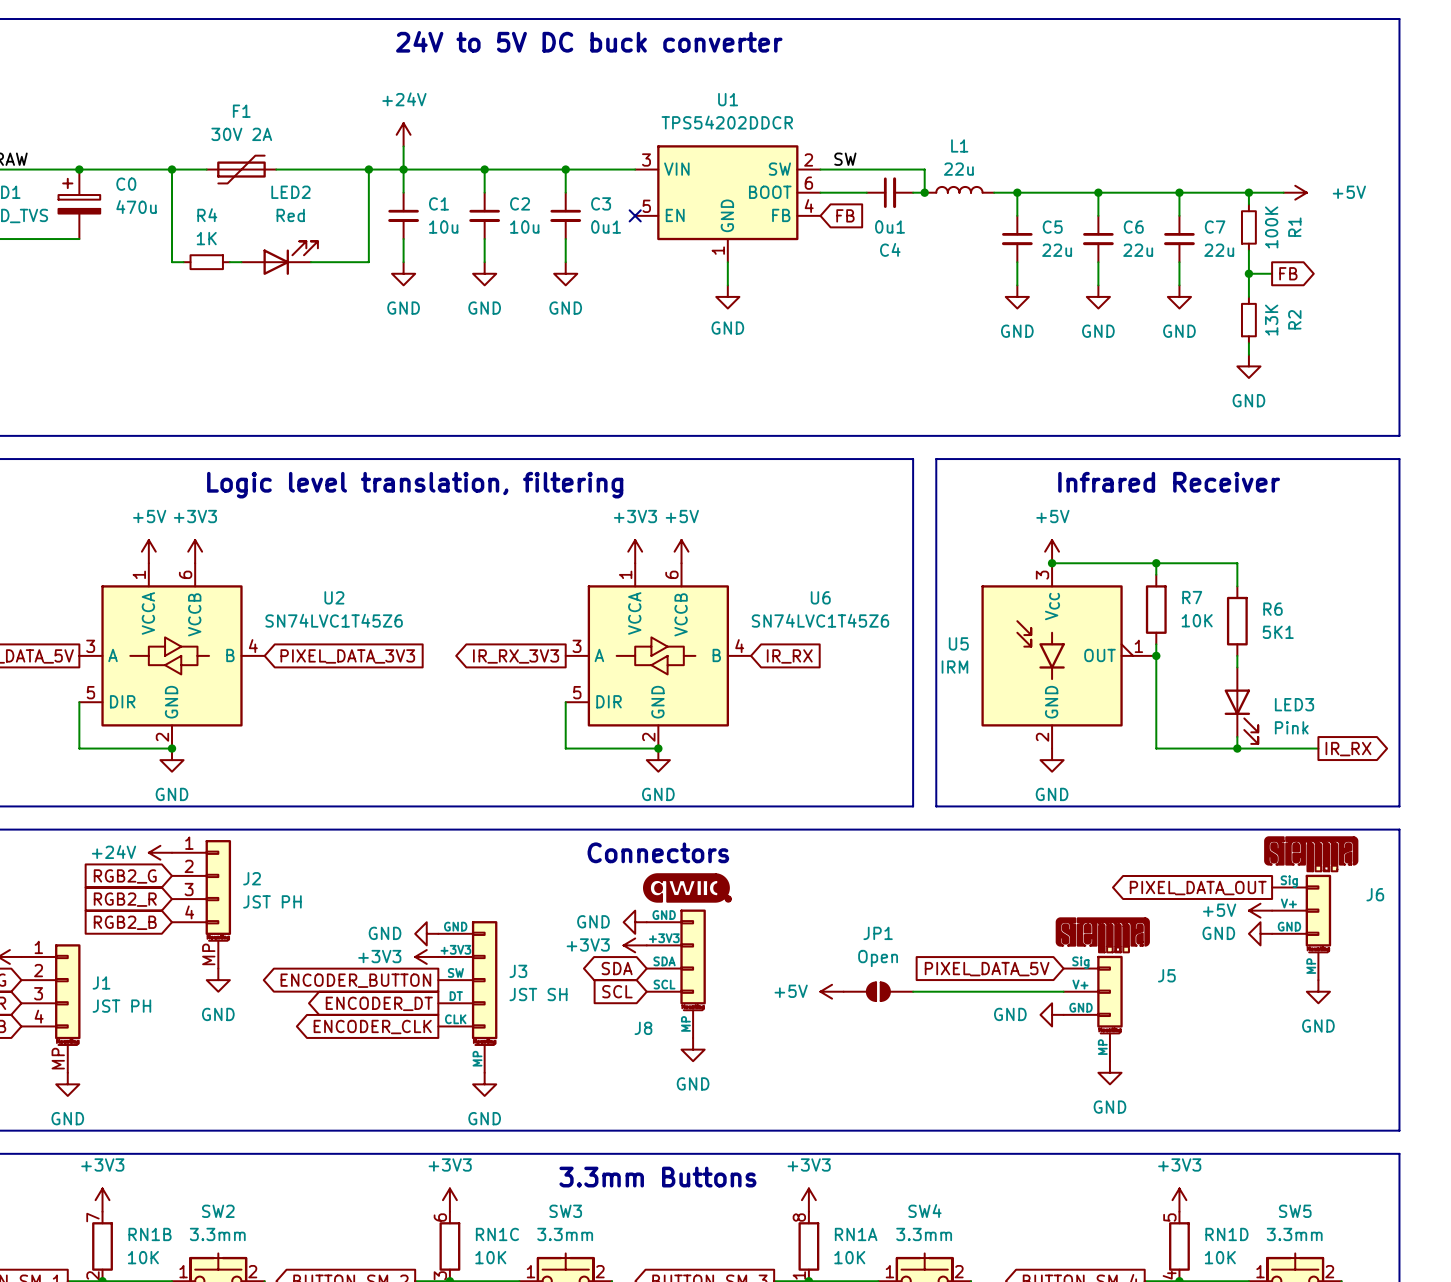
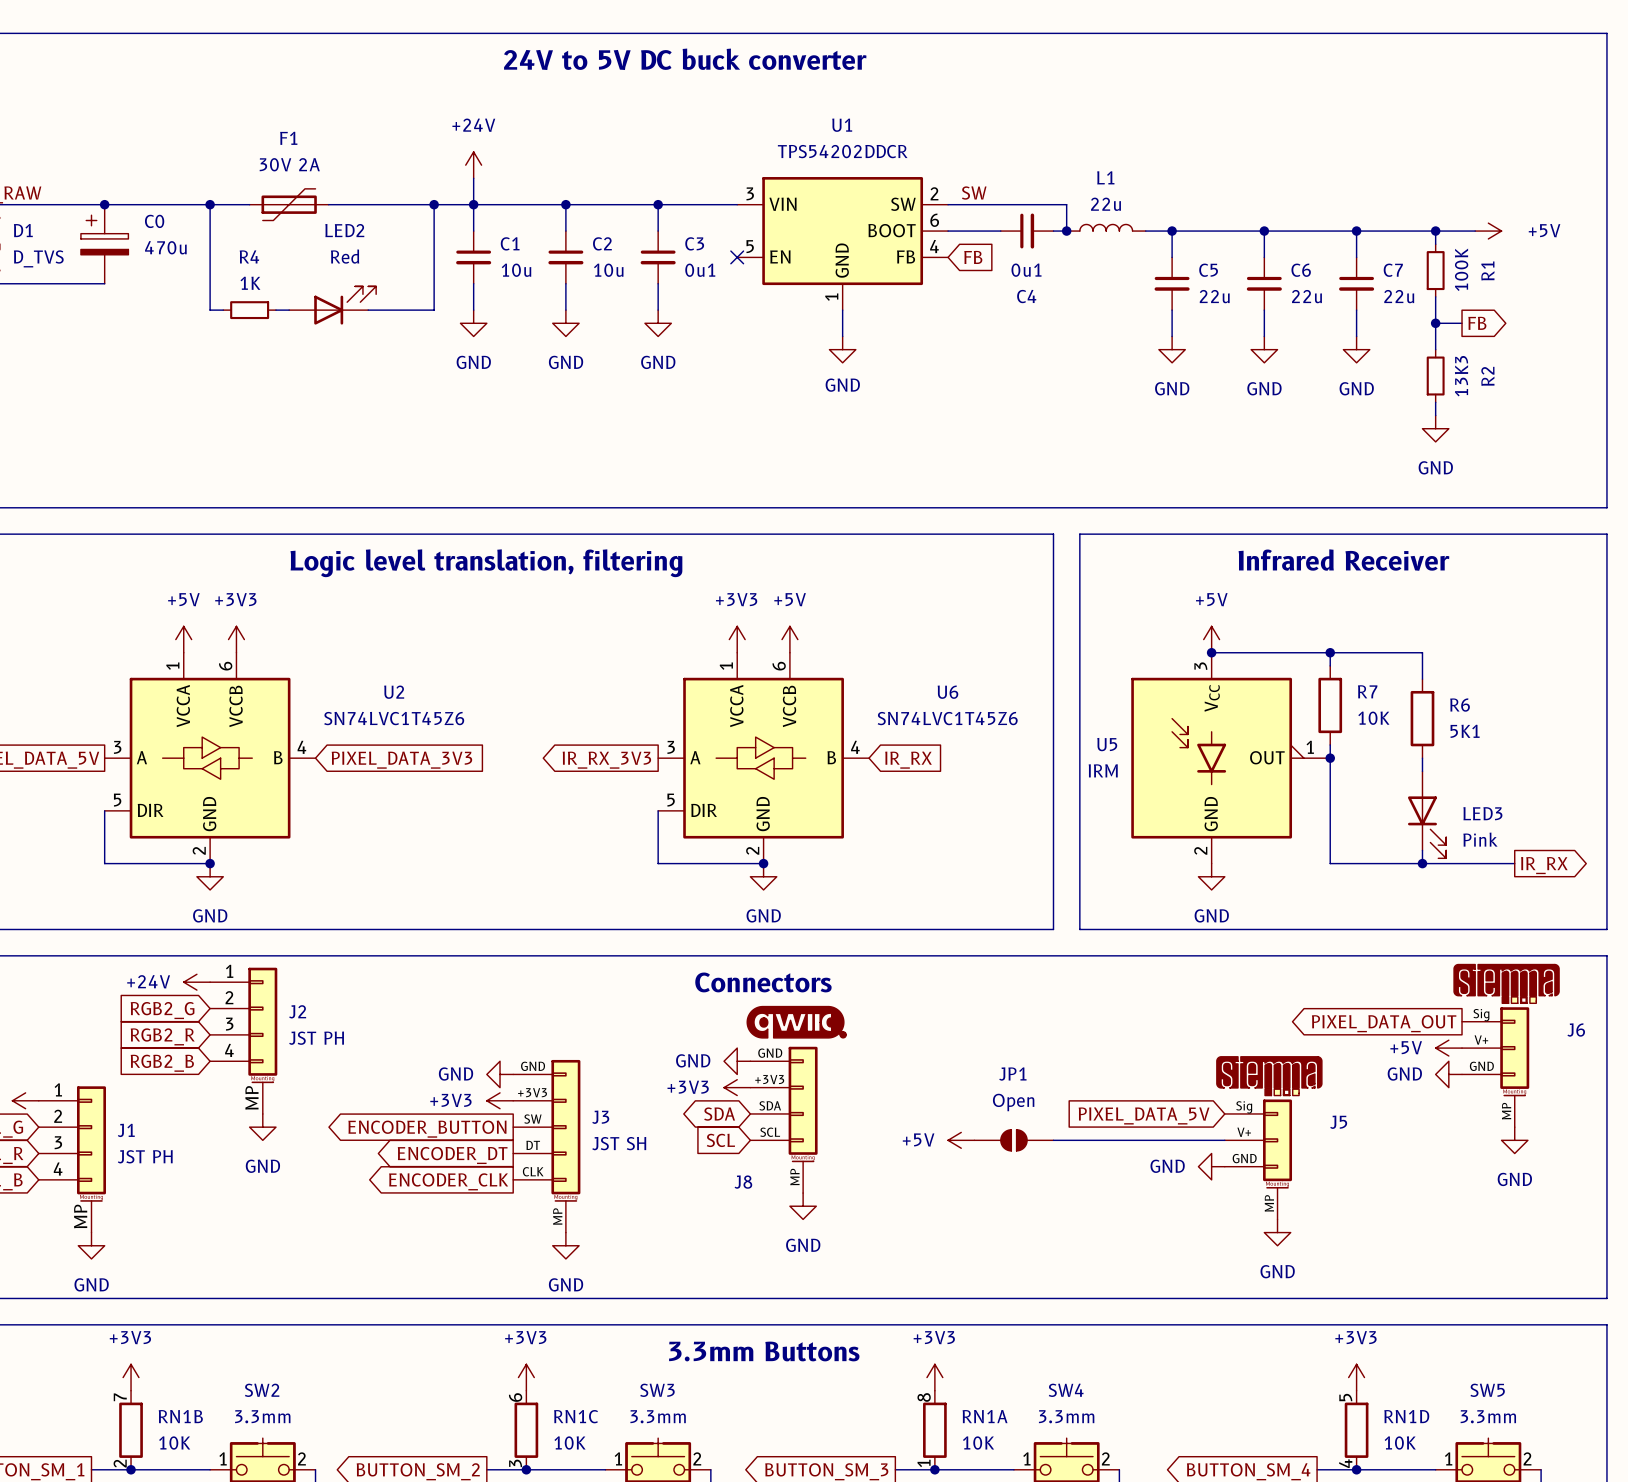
R2 value: 13K (1271, 320) -> 13K3 (1461, 376)

